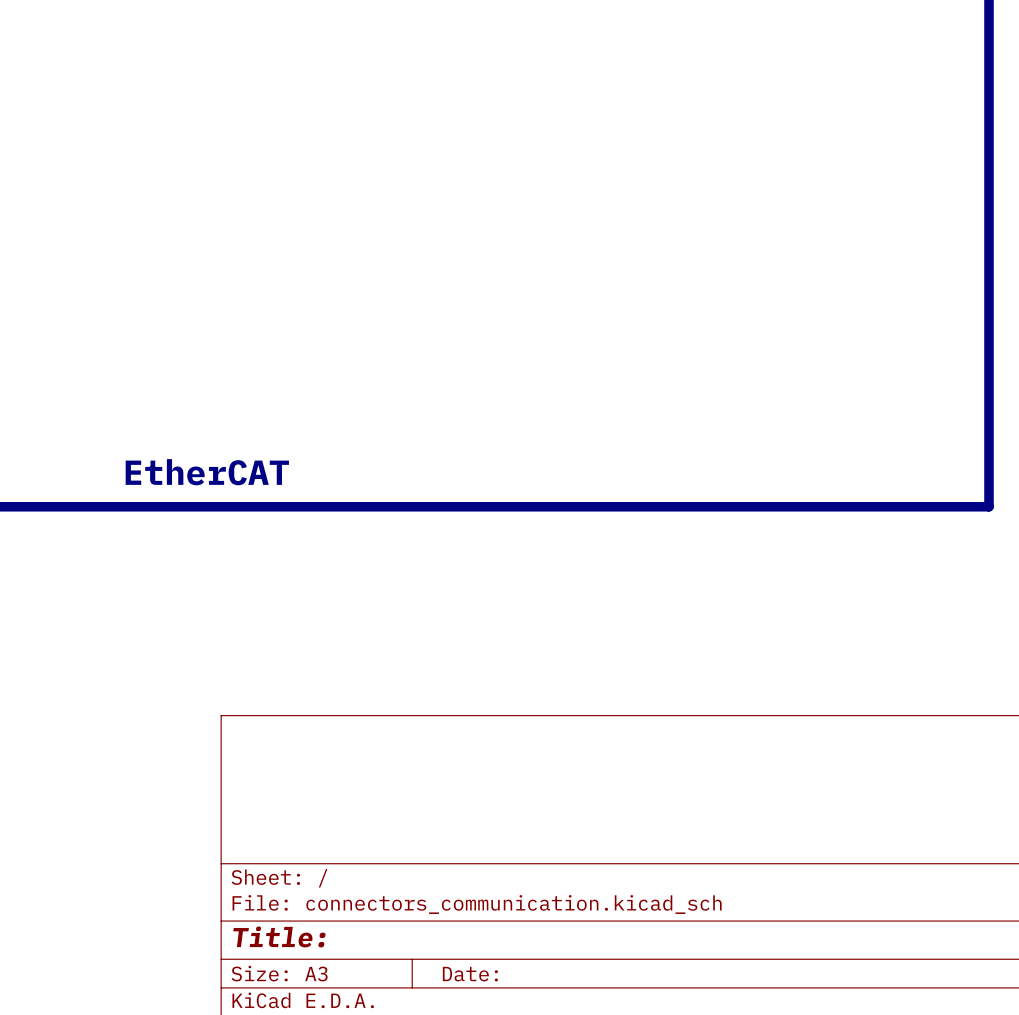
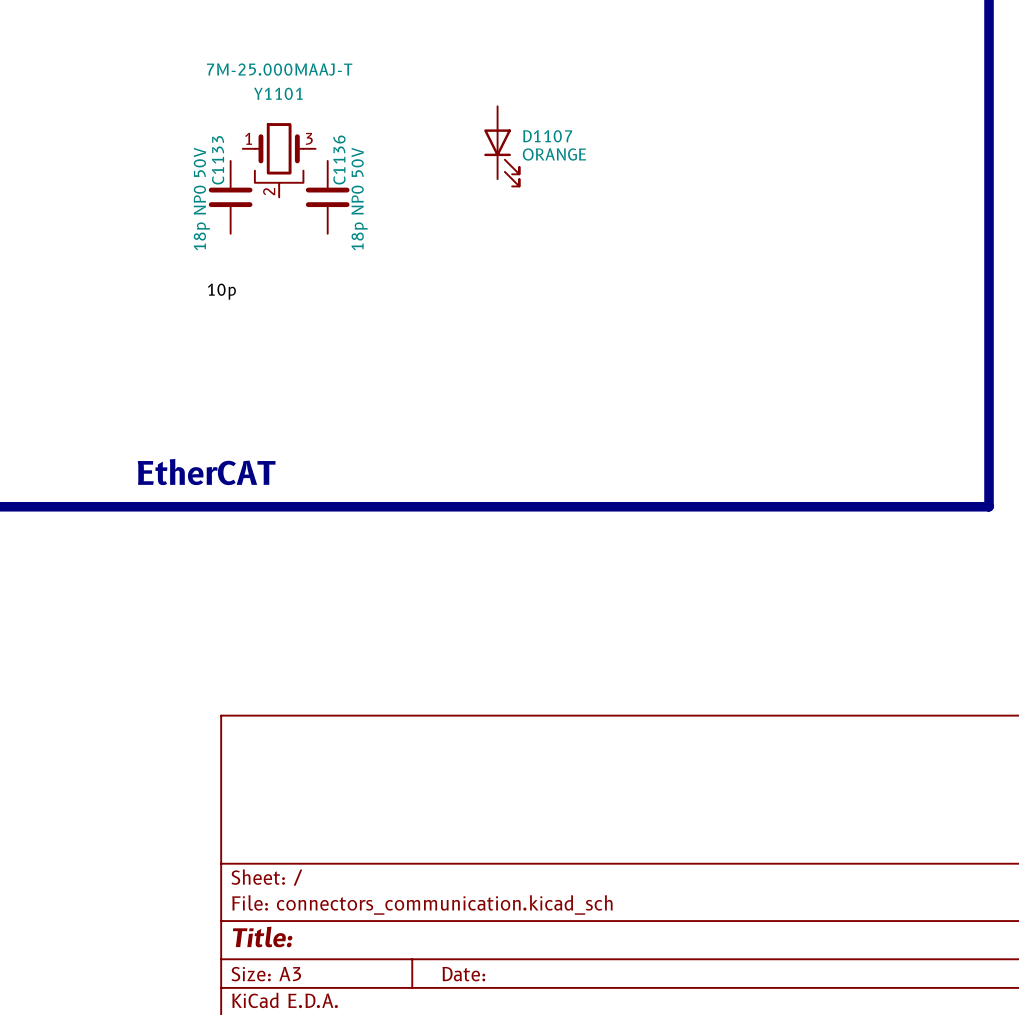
D1107: none -> ORANGE (501, 146)
Y1101: none -> 7M-25.000MAAJ-T (279, 160)
C1133: none -> 18p NP0 50V (230, 197)
C1136: none -> 18p NP0 50V (327, 197)
label: none -> 10p (221, 291)

